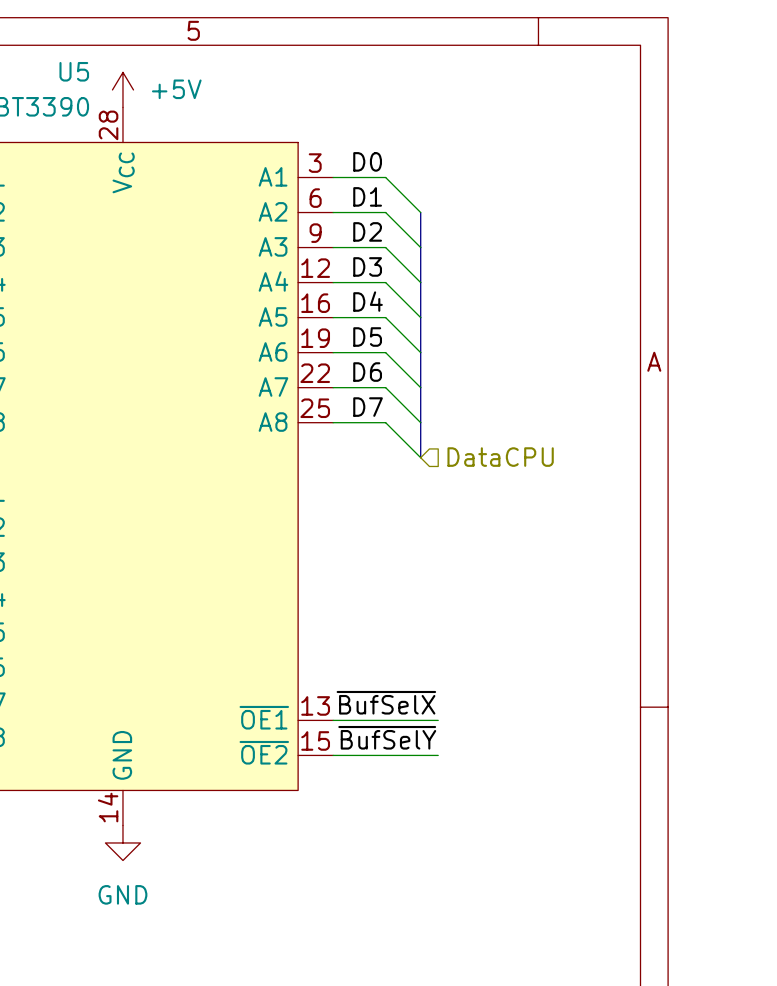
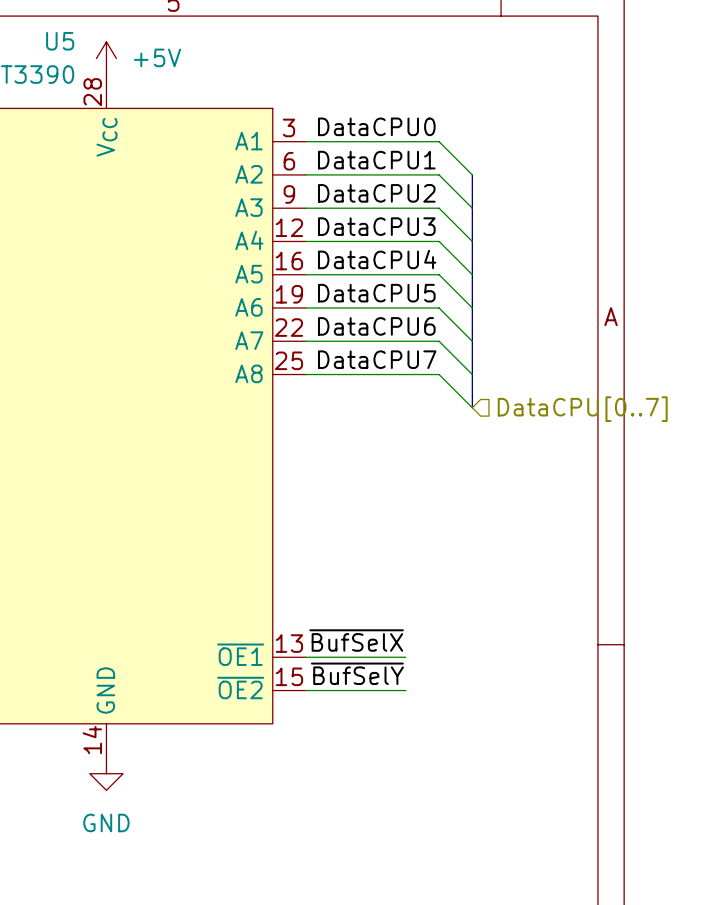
label: D0 (367, 161) -> none
label: none -> DataCPU0 (376, 126)
wire: (385, 177) (420, 212) -> (355, 141) (439, 141) (472, 174)
label: D1 (367, 196) -> none
label: none -> DataCPU1 (376, 160)
wire: (385, 212) (420, 247) -> (355, 174) (439, 174) (472, 208)
bus: (420, 212) (420, 457) -> (472, 174) (472, 407)
label: D2 (367, 231) -> none
label: none -> DataCPU2 (376, 193)
wire: (385, 247) (420, 282) -> (355, 208) (439, 208) (472, 241)
label: D3 (367, 266) -> none
label: none -> DataCPU3 (376, 226)
wire: (385, 282) (420, 317) -> (355, 241) (439, 241) (472, 274)
label: D4 (368, 301) -> none
label: none -> DataCPU4 (377, 259)
wire: (385, 317) (420, 352) -> (355, 274) (439, 274) (472, 308)
label: D5 (367, 337) -> none
label: none -> DataCPU5 (376, 293)
wire: (385, 352) (420, 387) -> (355, 308) (439, 308) (472, 341)
label: D6 (367, 372) -> none
label: none -> DataCPU6 (376, 326)
wire: (385, 387) (420, 422) -> (355, 341) (439, 341) (472, 374)
label: D7 (368, 407) -> none
label: none -> DataCPU7 (377, 359)
wire: (385, 422) (420, 457) -> (355, 374) (439, 374) (472, 407)
hierarchical label: DataCPU (500, 457) -> DataCPU[0..7] (582, 409)

